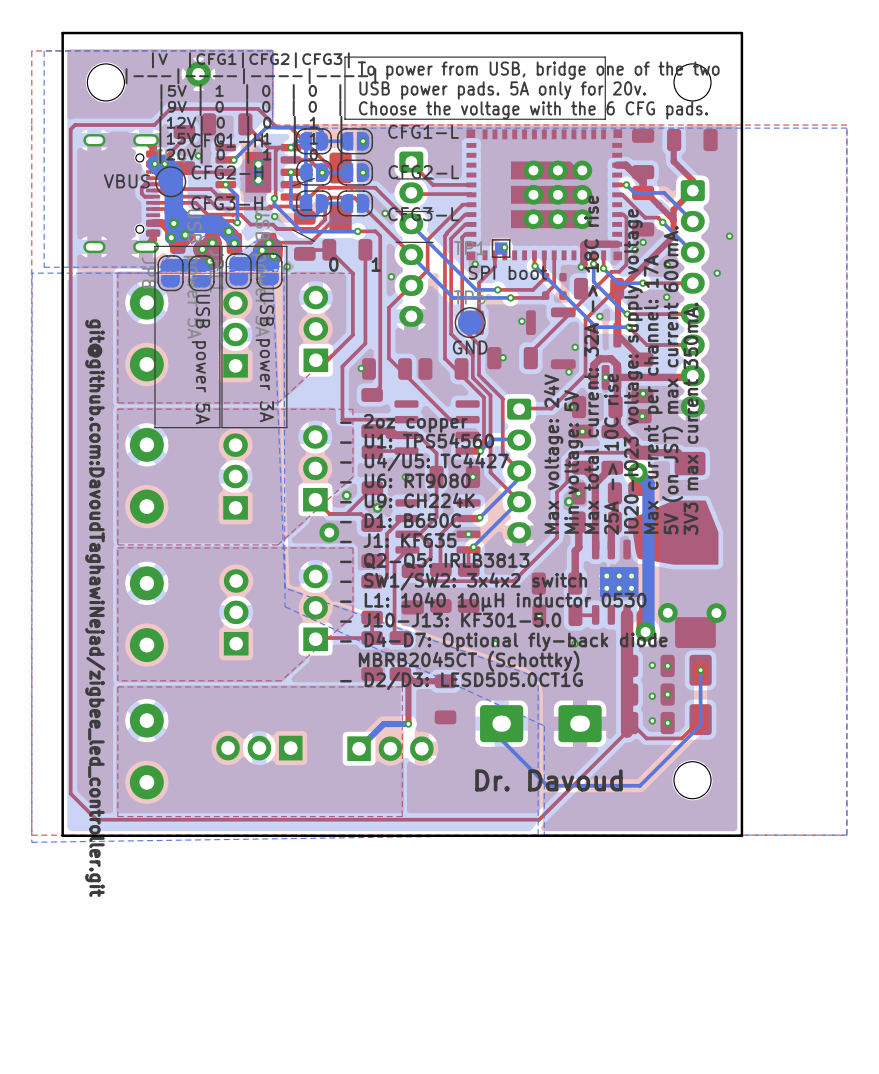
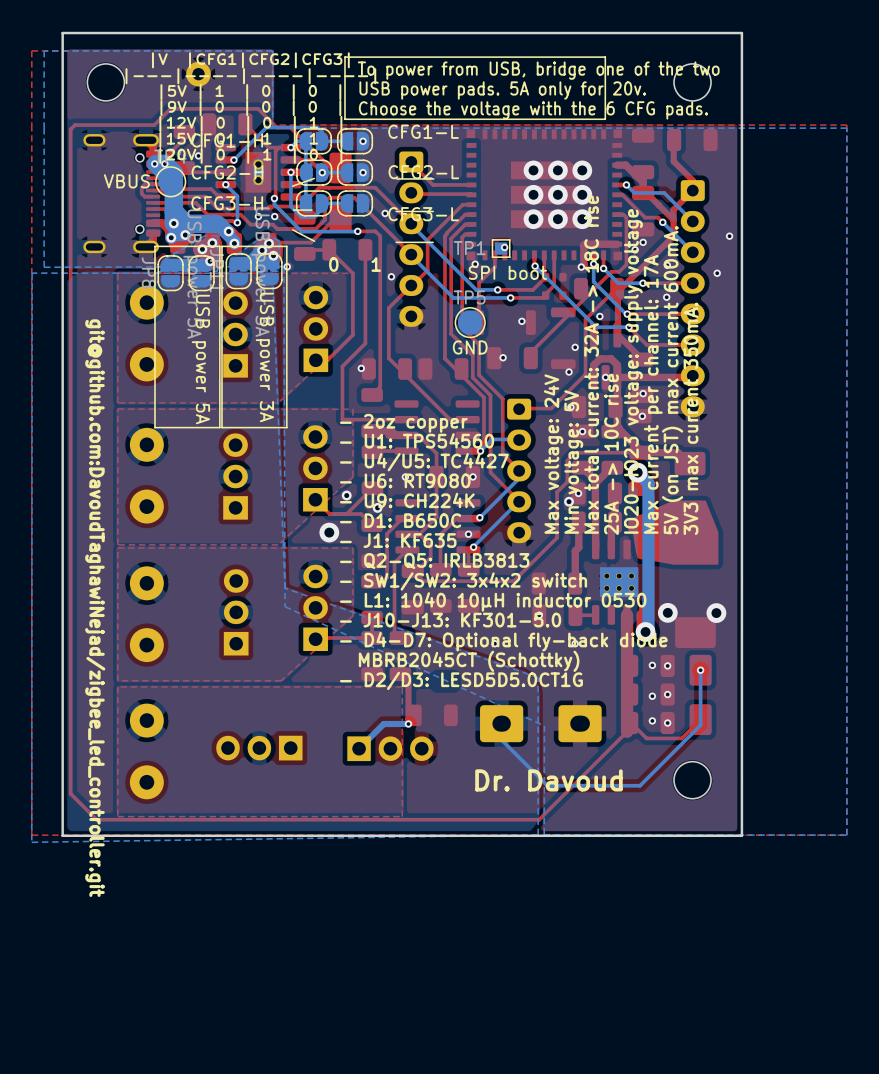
top track: (406, 674) (413, 681) (445, 681) -> none
part rotation: 0° (445, 699) -> 90° clockwise (432, 715)

